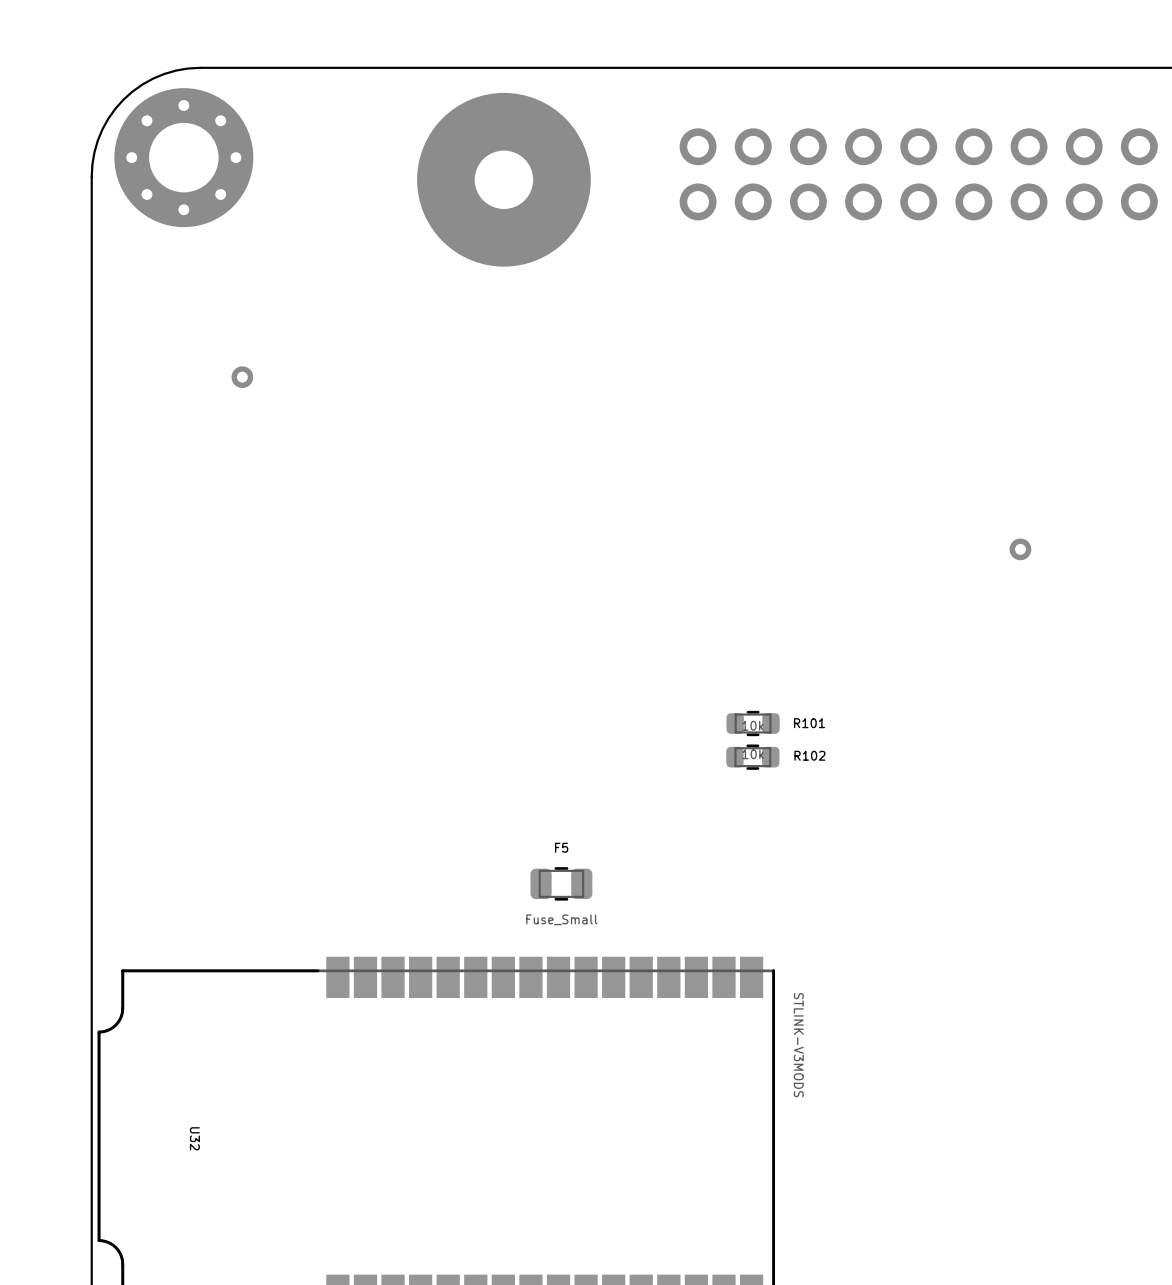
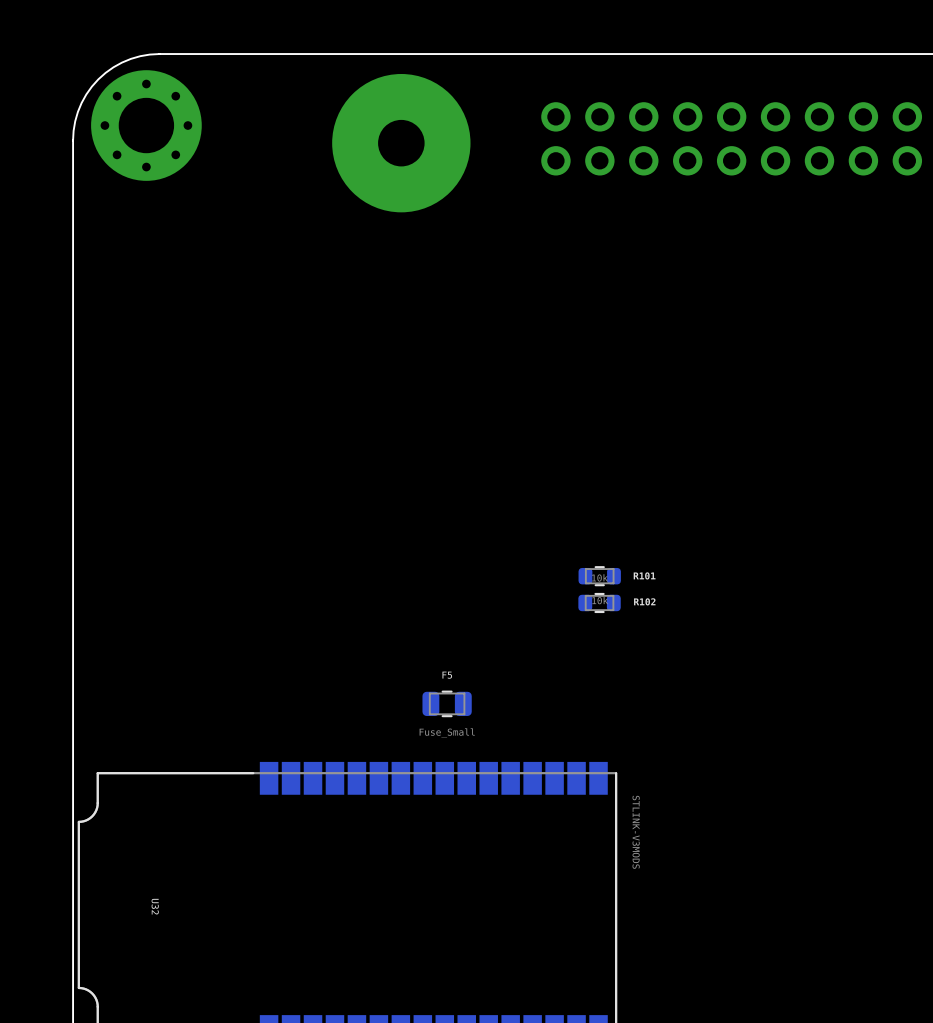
part: (242, 377) -> none
part: (1020, 549) -> none

